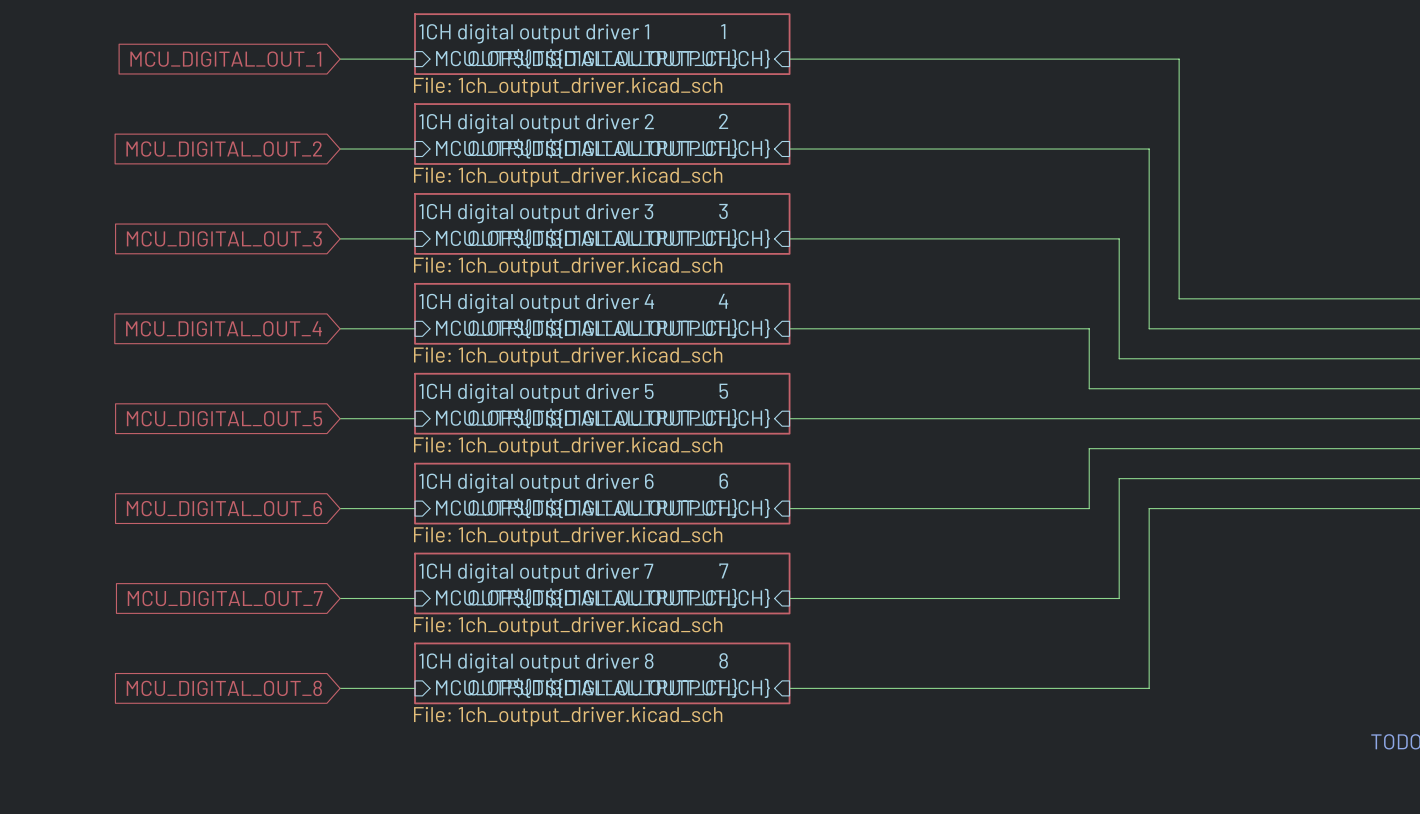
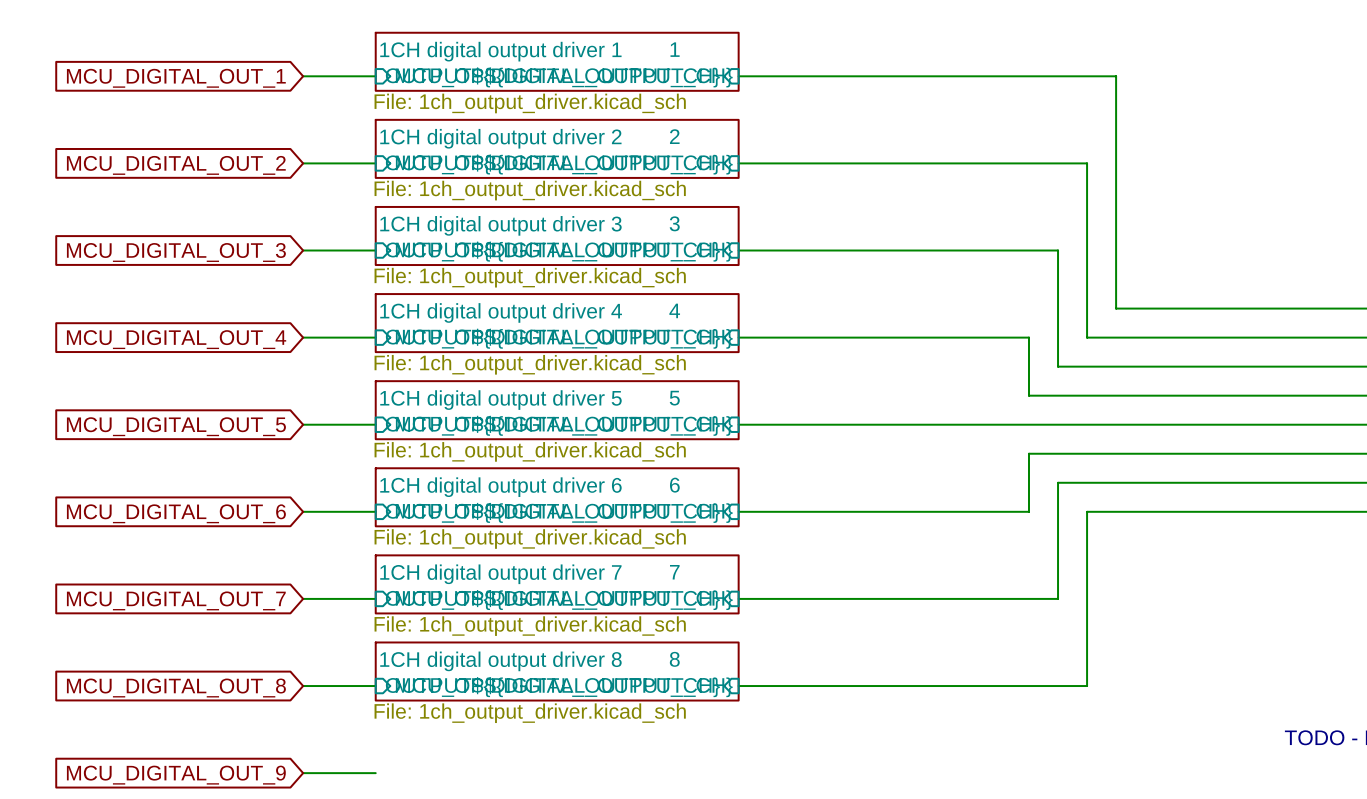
global label: none -> MCU_DIGITAL_OUT_9 (176, 775)
wire: none -> (303, 773) (375, 773)

